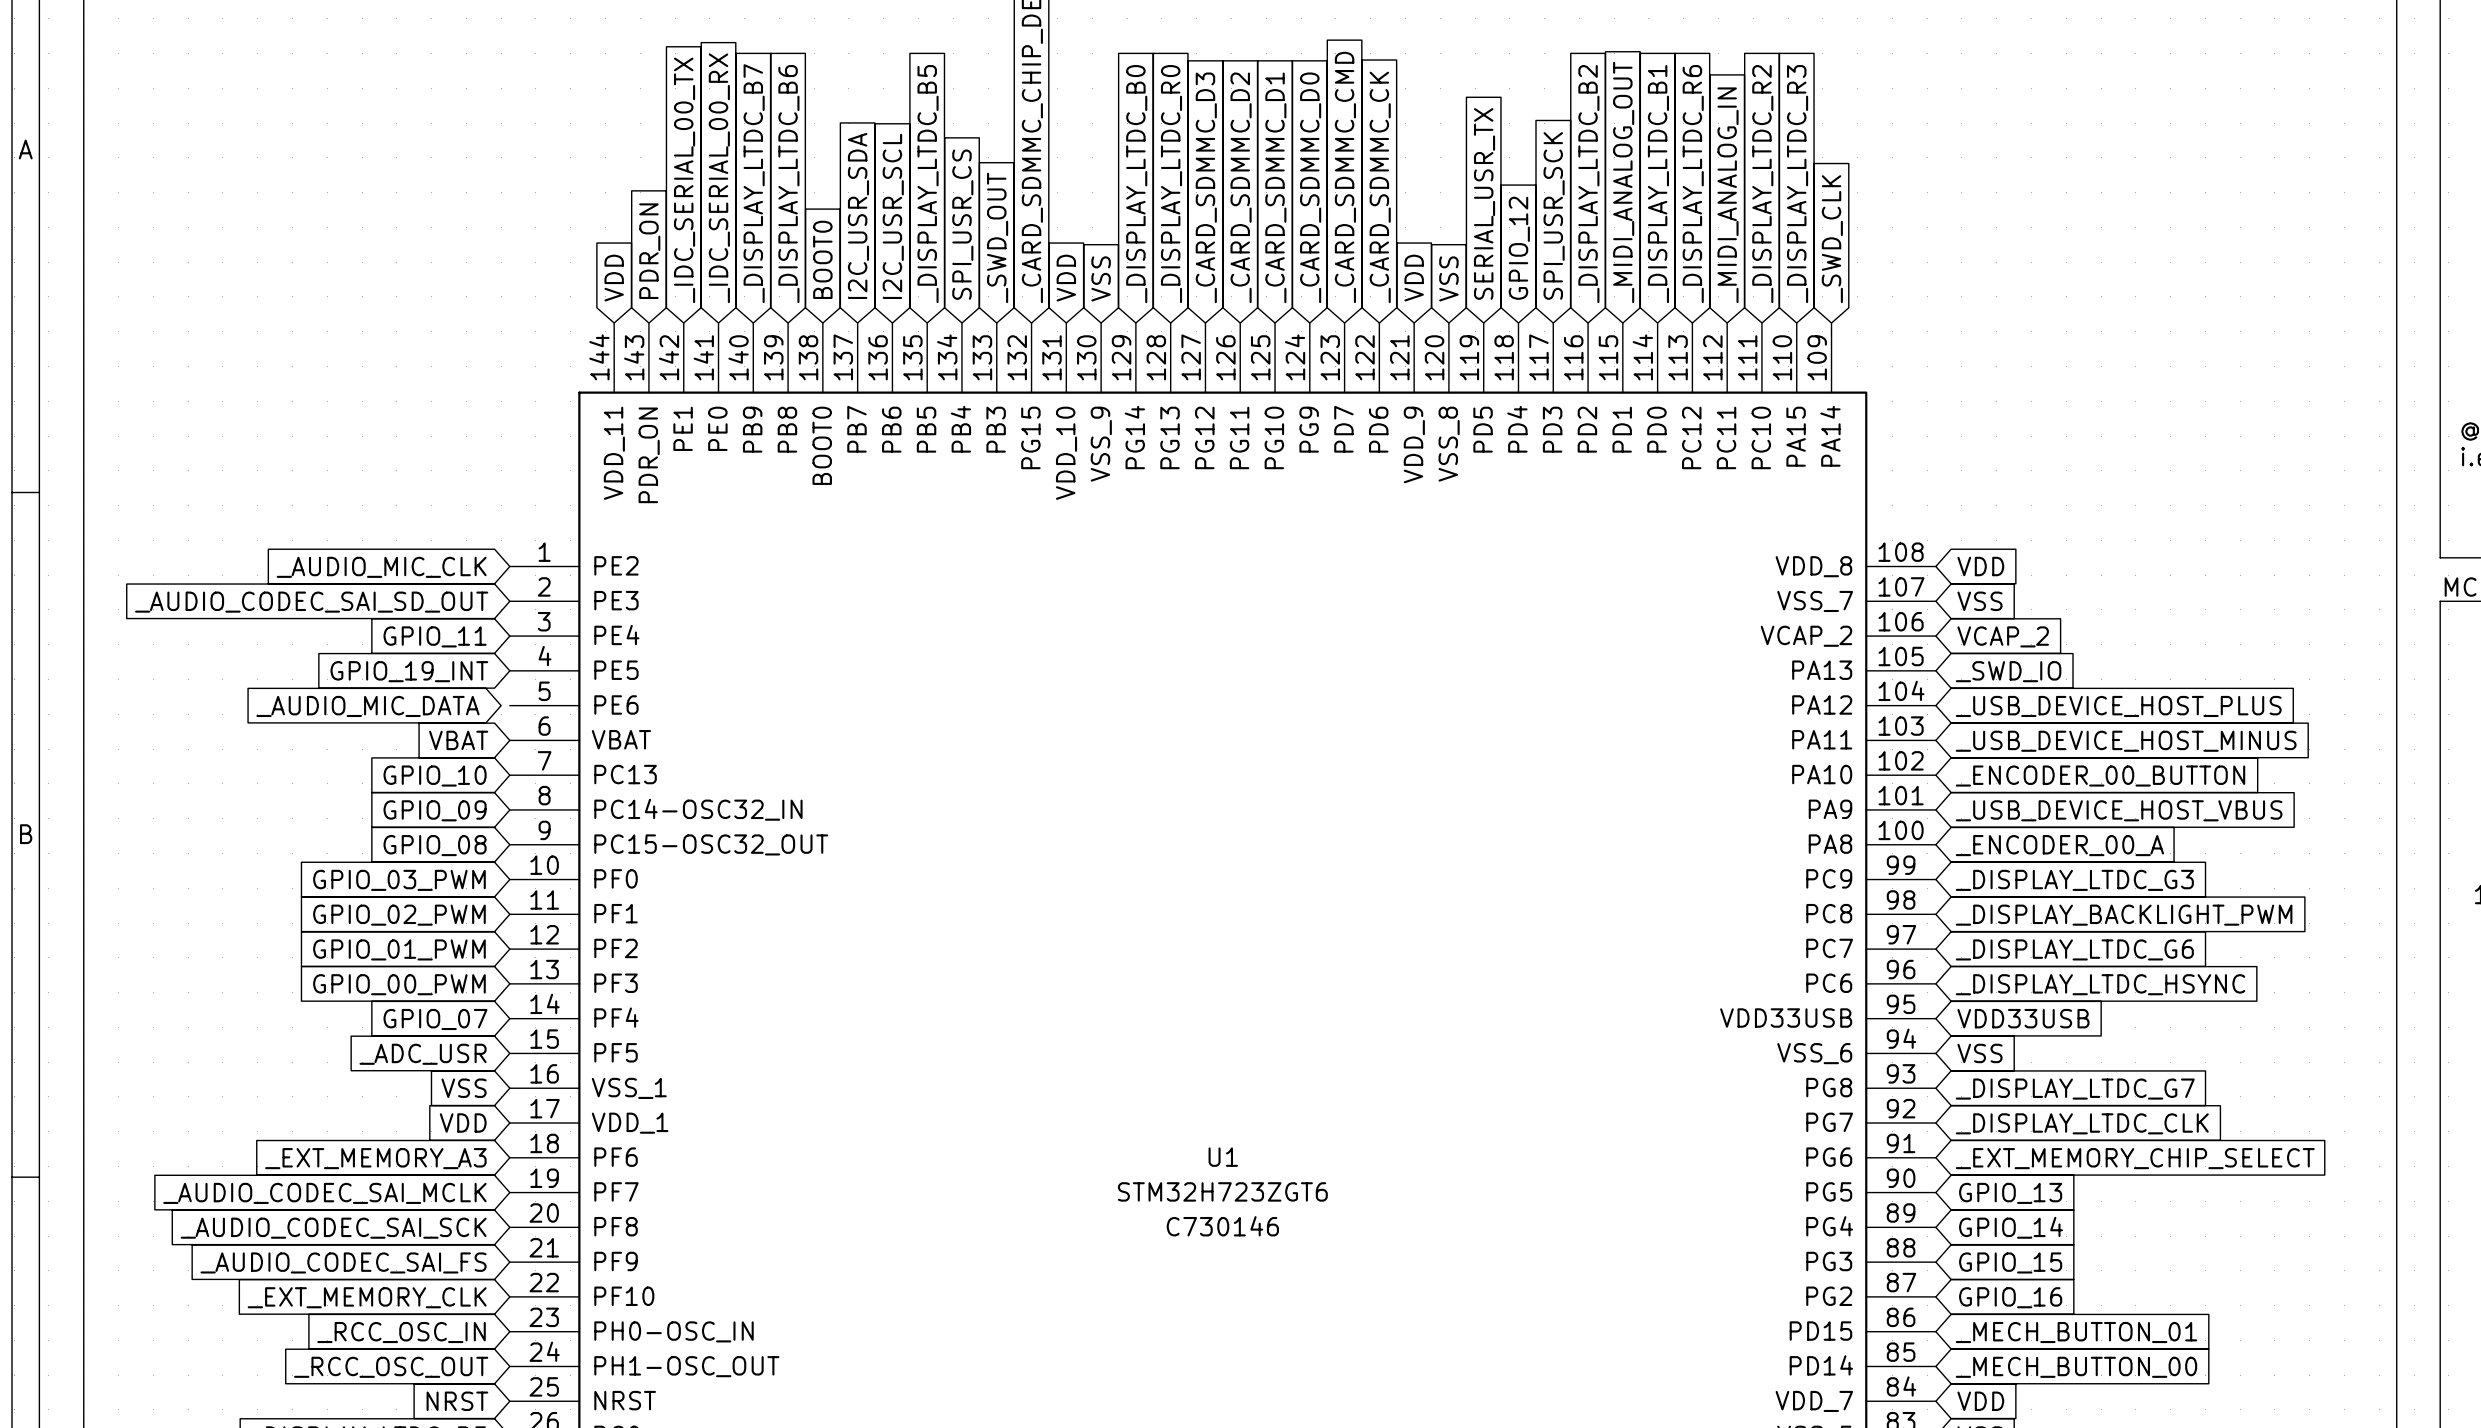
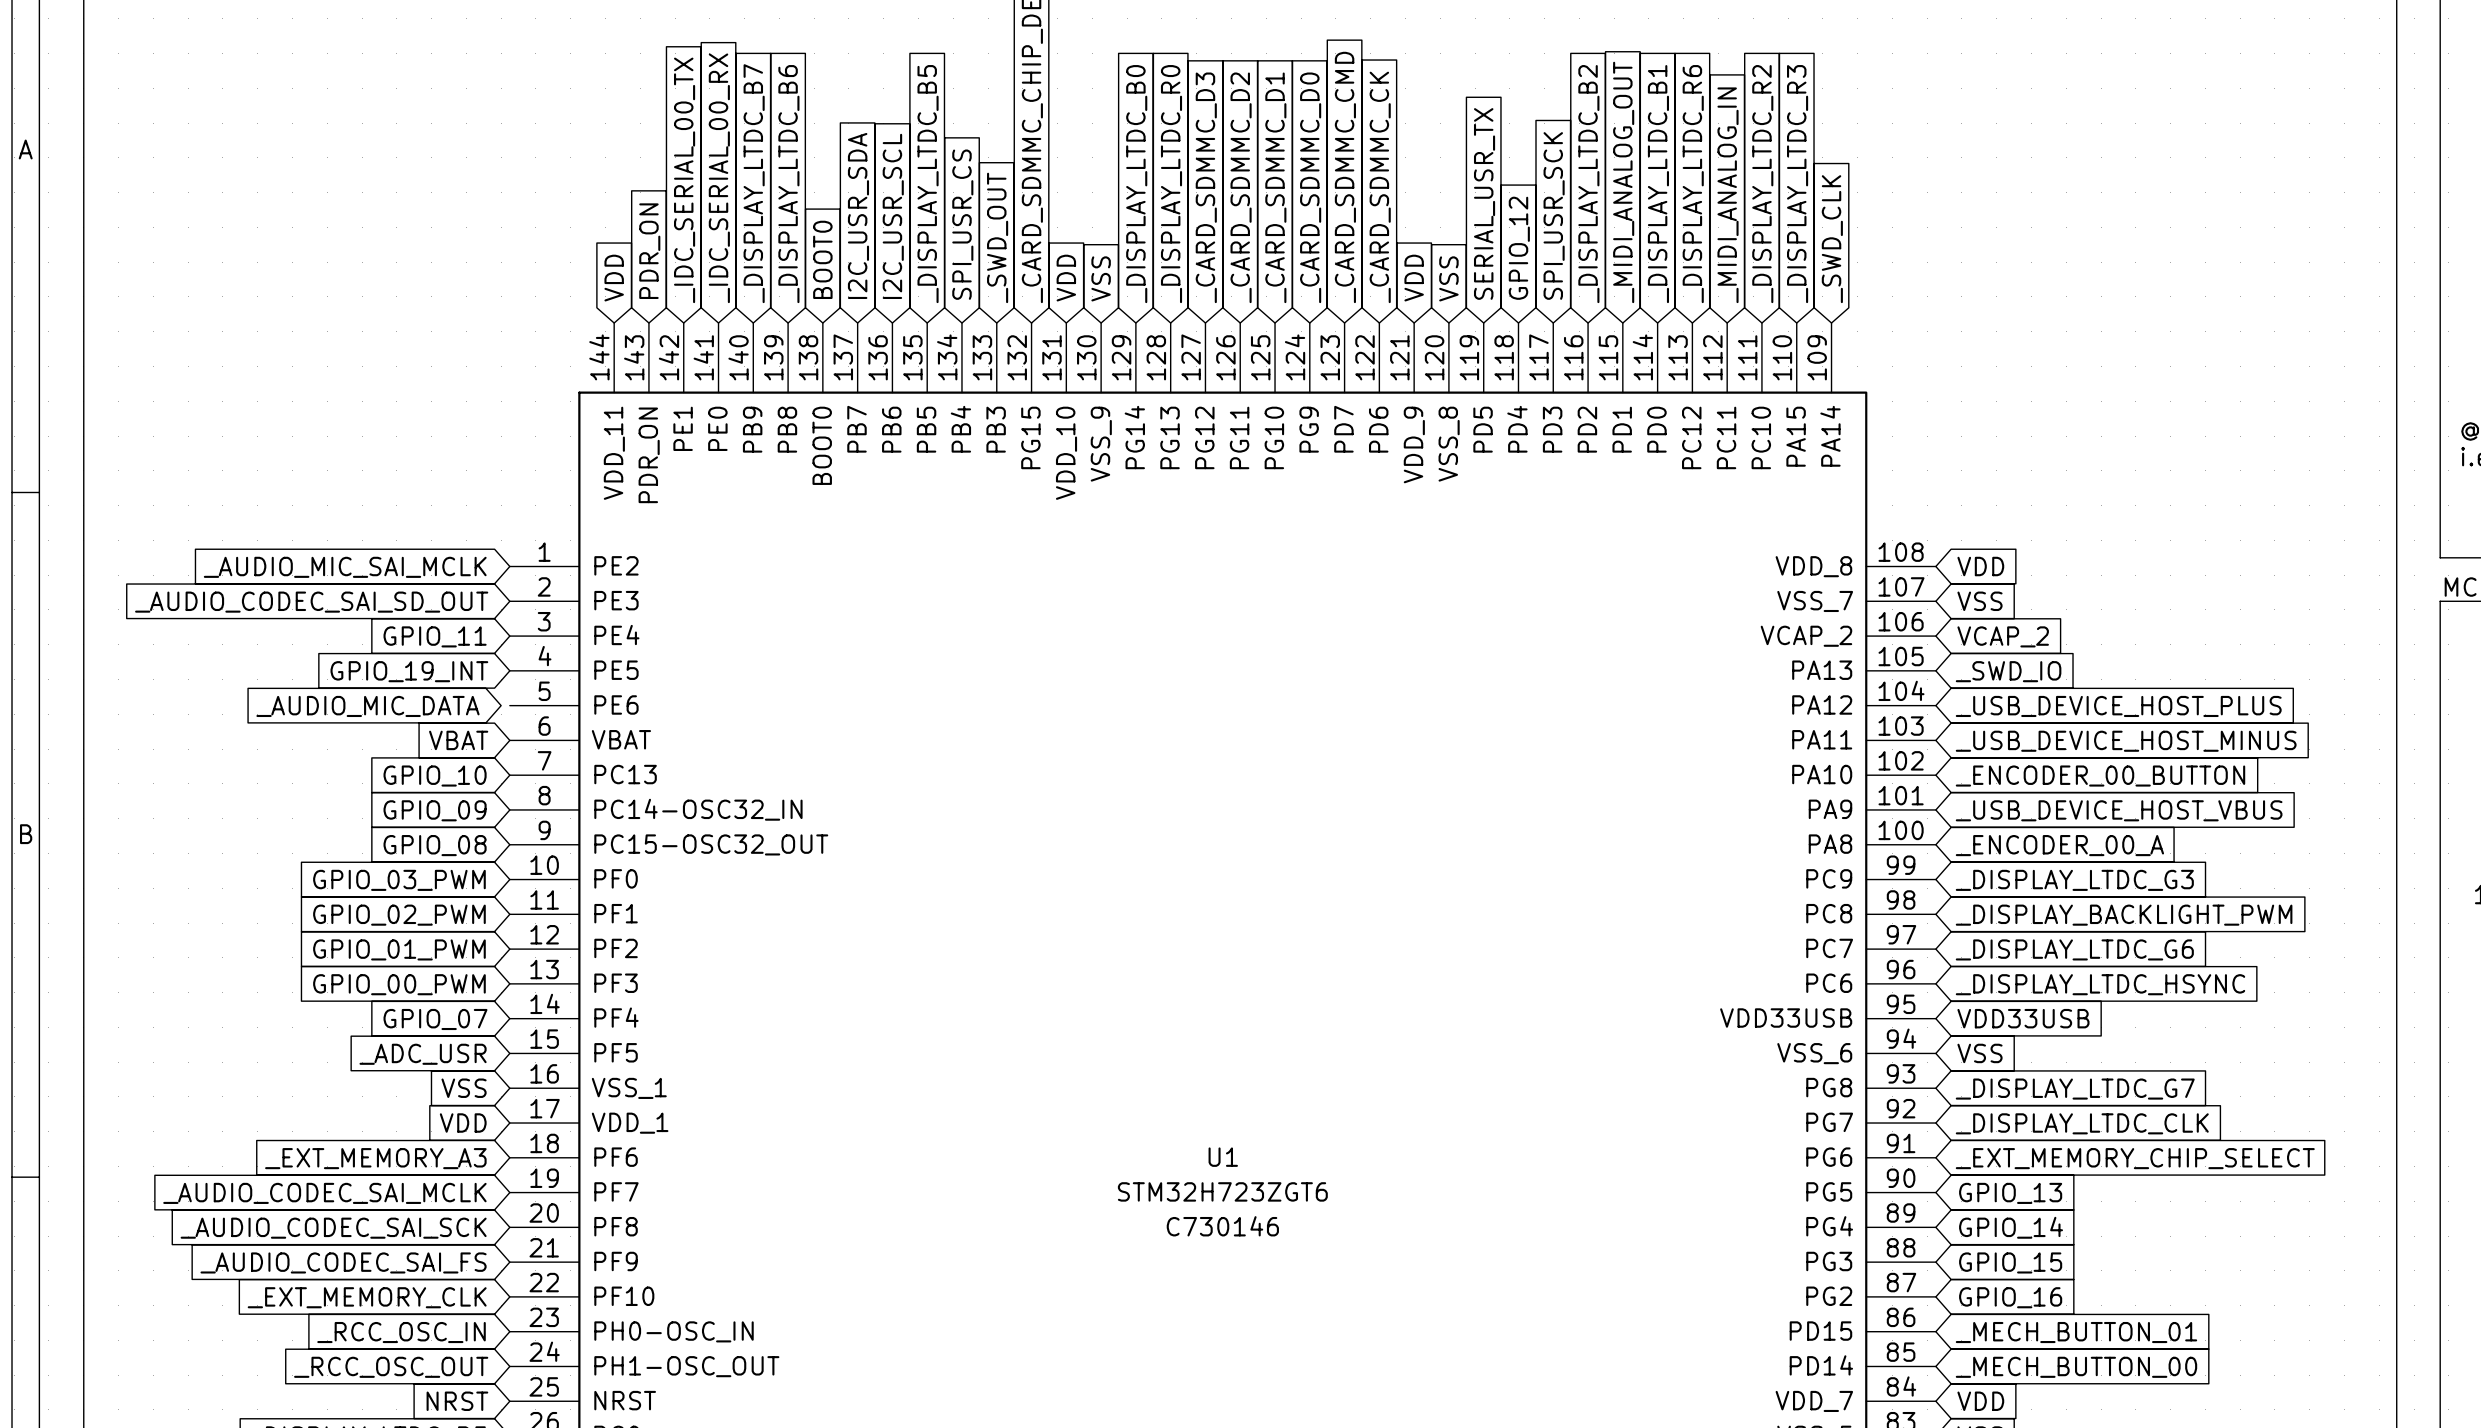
global label: _AUDIO_MIC_CLK (381, 567) -> _AUDIO_MIC_SAI_MCLK (345, 567)

